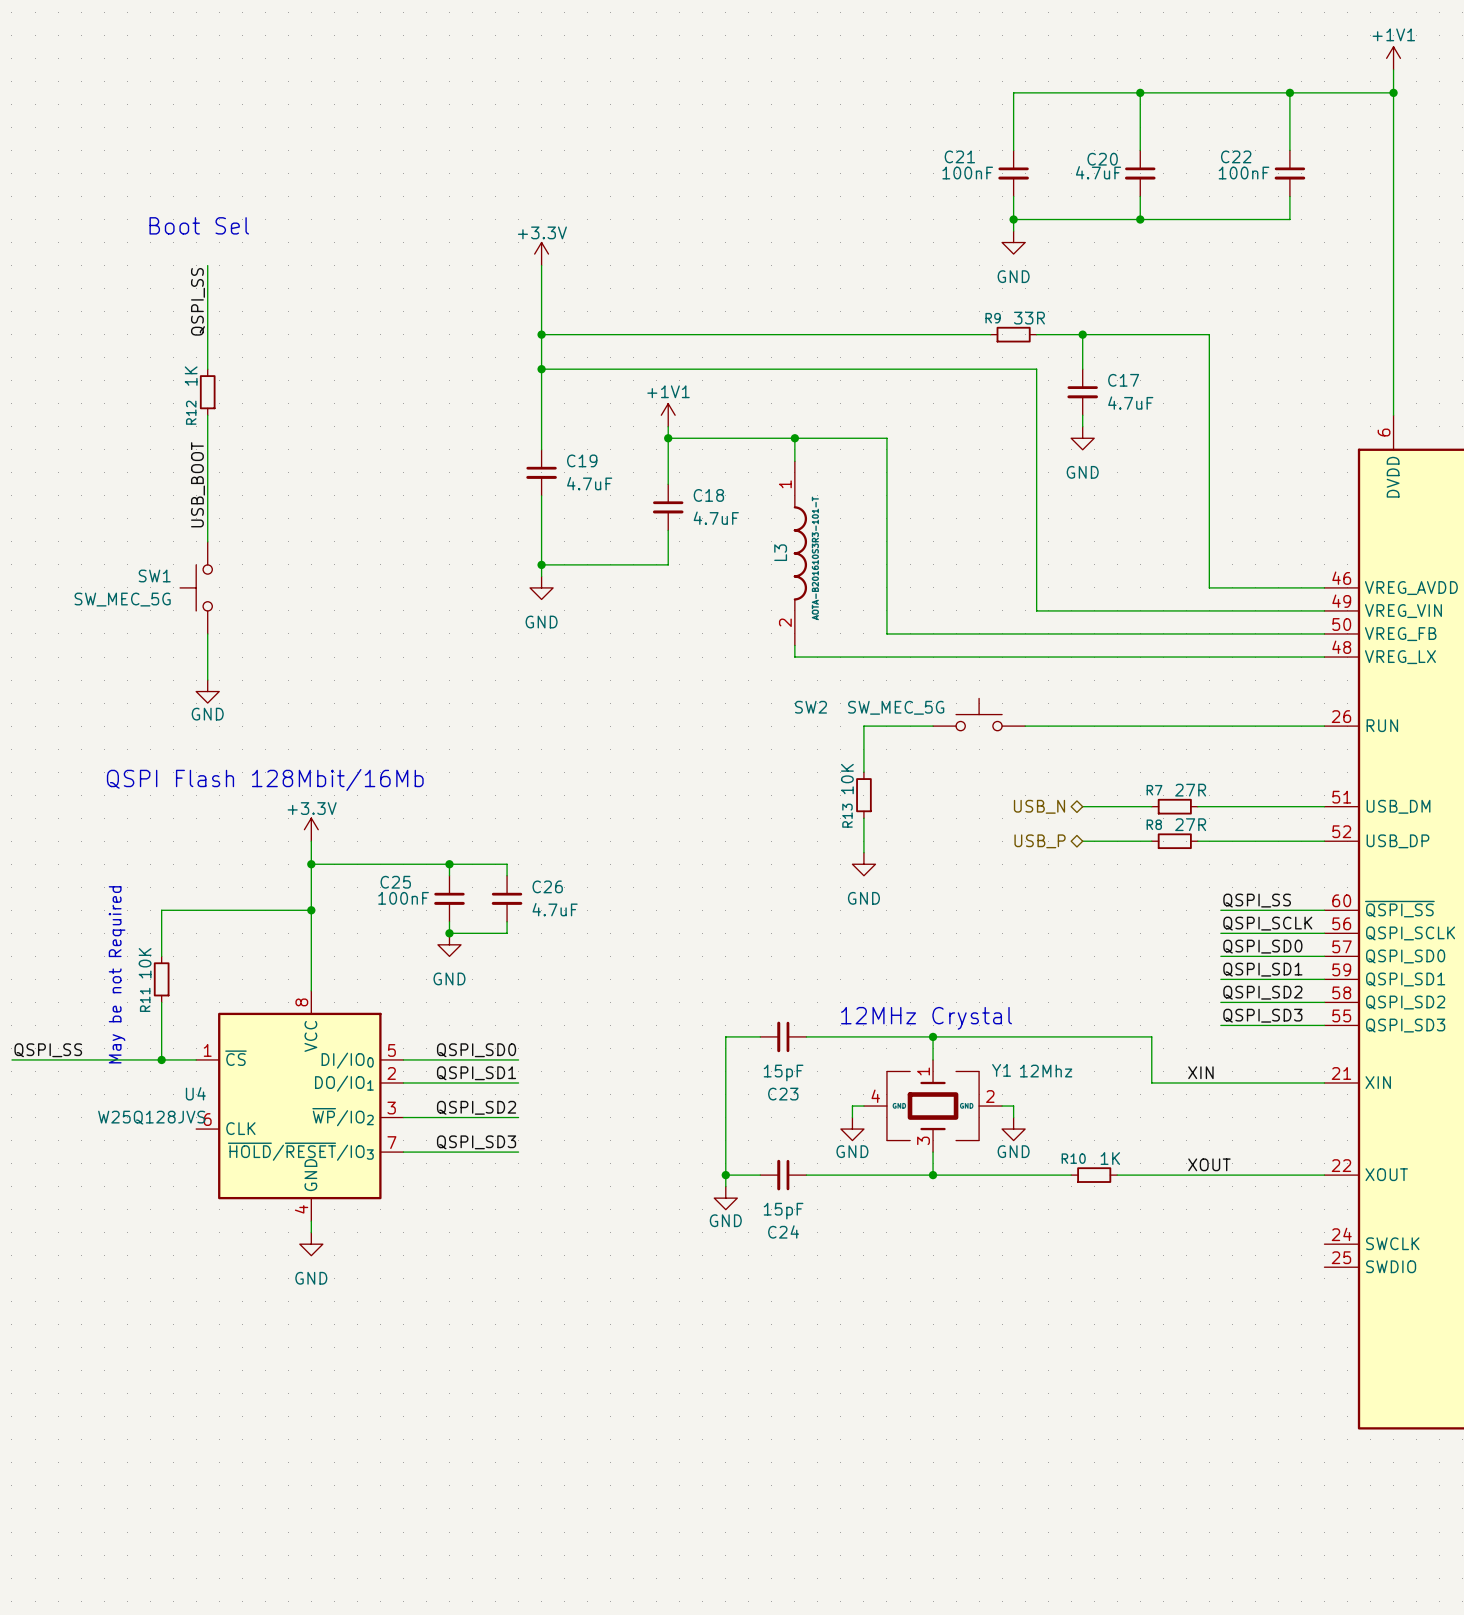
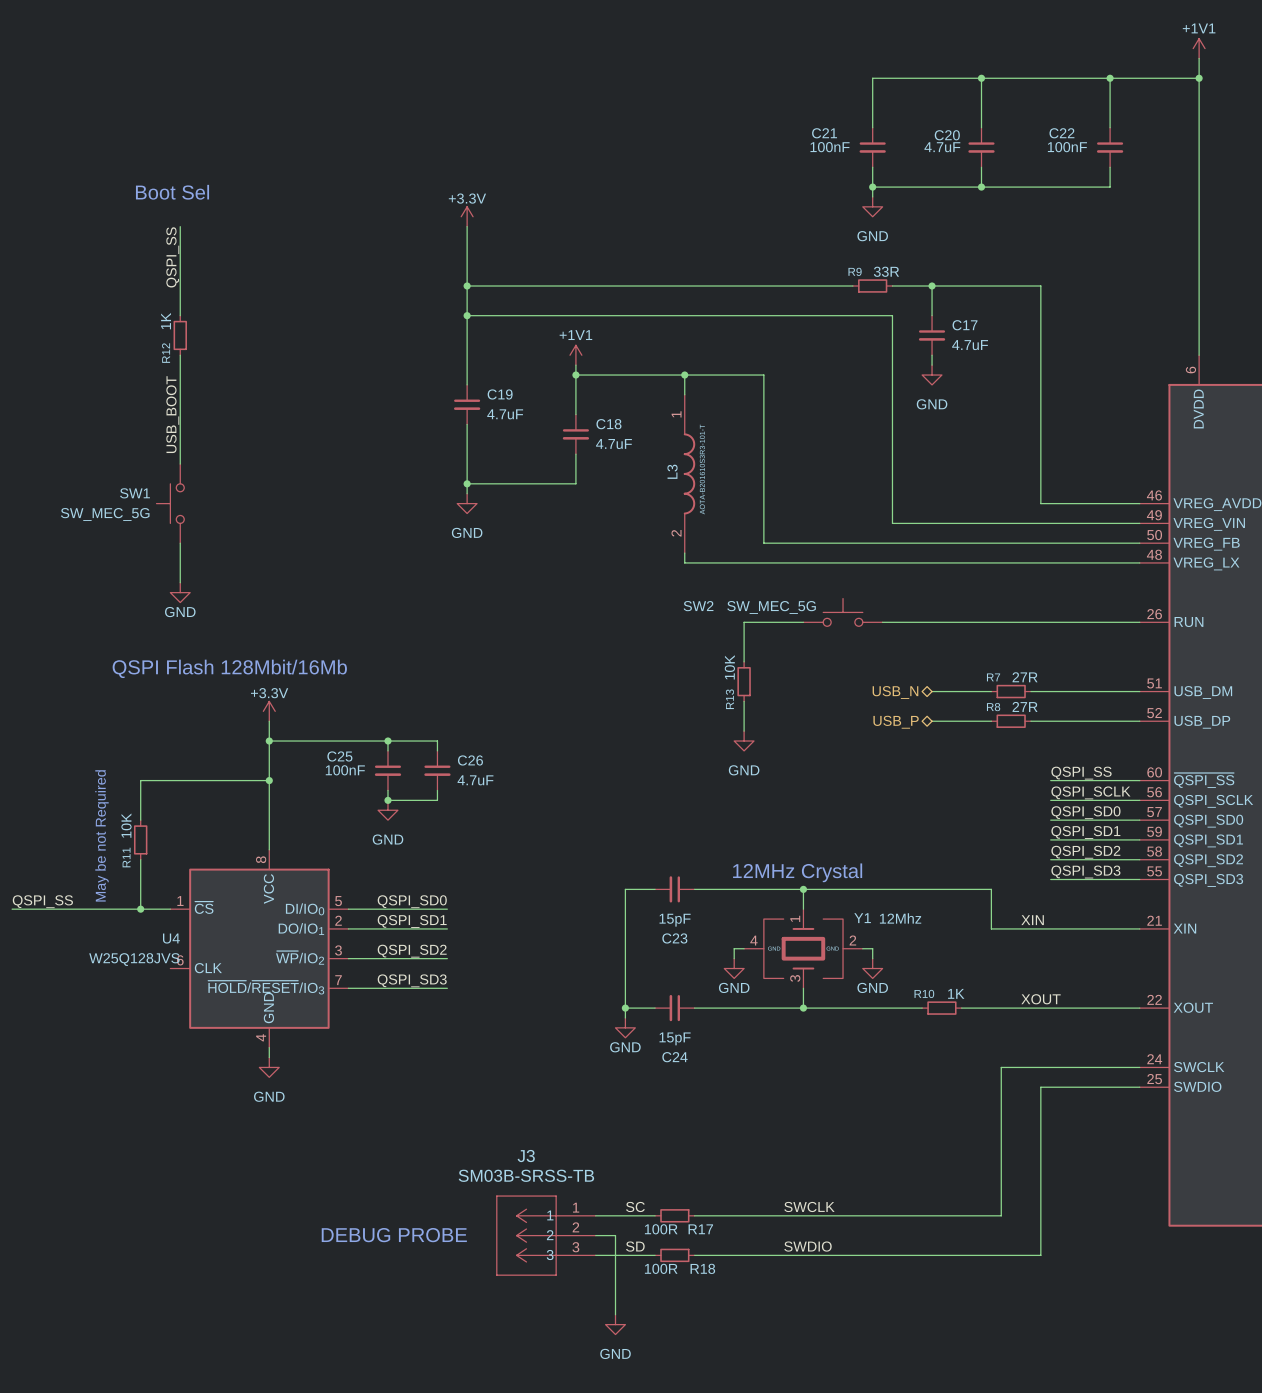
wire: none -> (1139, 1067) (1001, 1067) (1001, 1215) (694, 1215)
wire: none -> (1139, 1087) (1040, 1087) (1040, 1255) (694, 1255)
label: none -> SC (635, 1206)
label: none -> SWCLK (809, 1206)
wire: none -> (595, 1215) (655, 1215)
R17: none -> 100R (674, 1215)
text: none -> DEBUG PROBE (394, 1235)
J3: none -> SM03B-SRSS-TB (546, 1235)
wire: none -> (595, 1235) (615, 1235) (615, 1314)
label: none -> SD (635, 1246)
label: none -> SWDIO (808, 1246)
wire: none -> (595, 1255) (655, 1255)
R18: none -> 100R (674, 1255)
power symbol: none -> GND (615, 1324)

